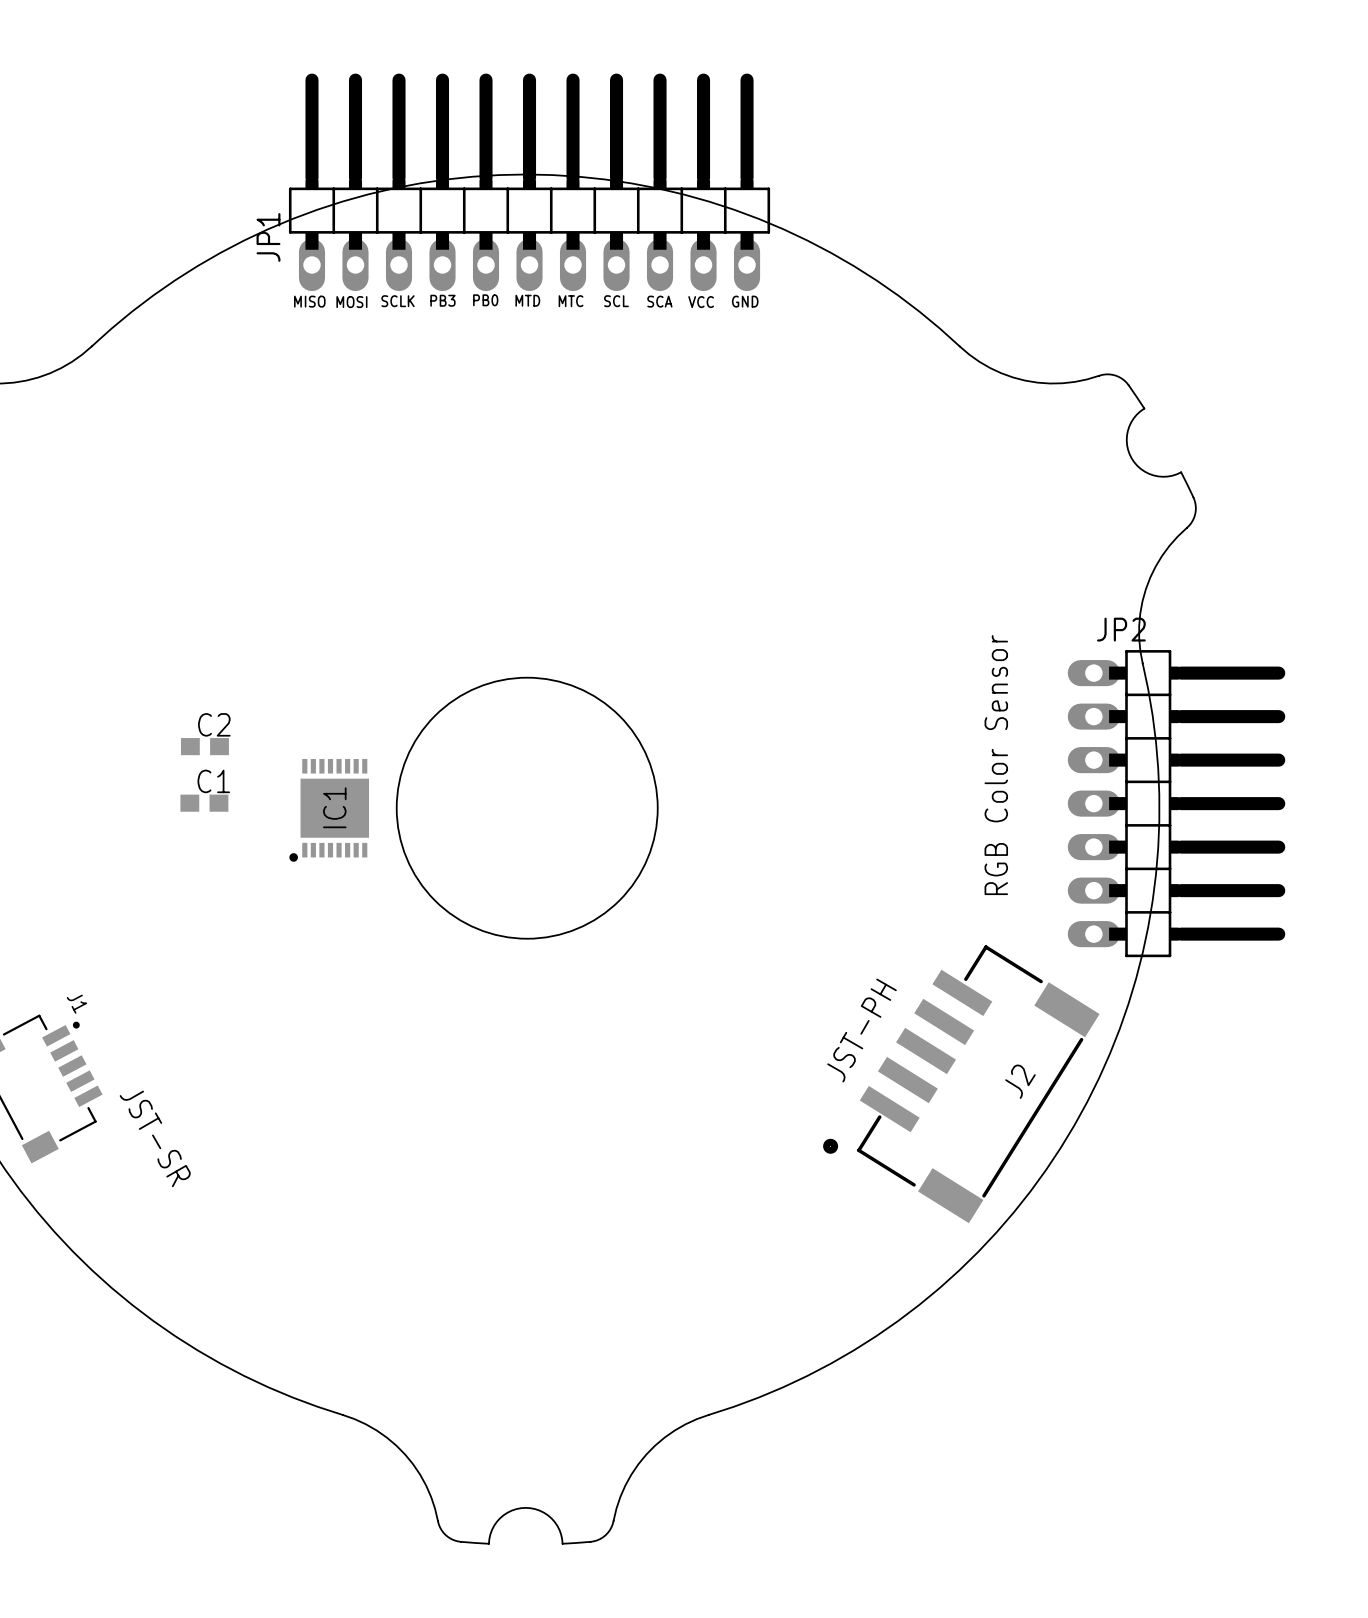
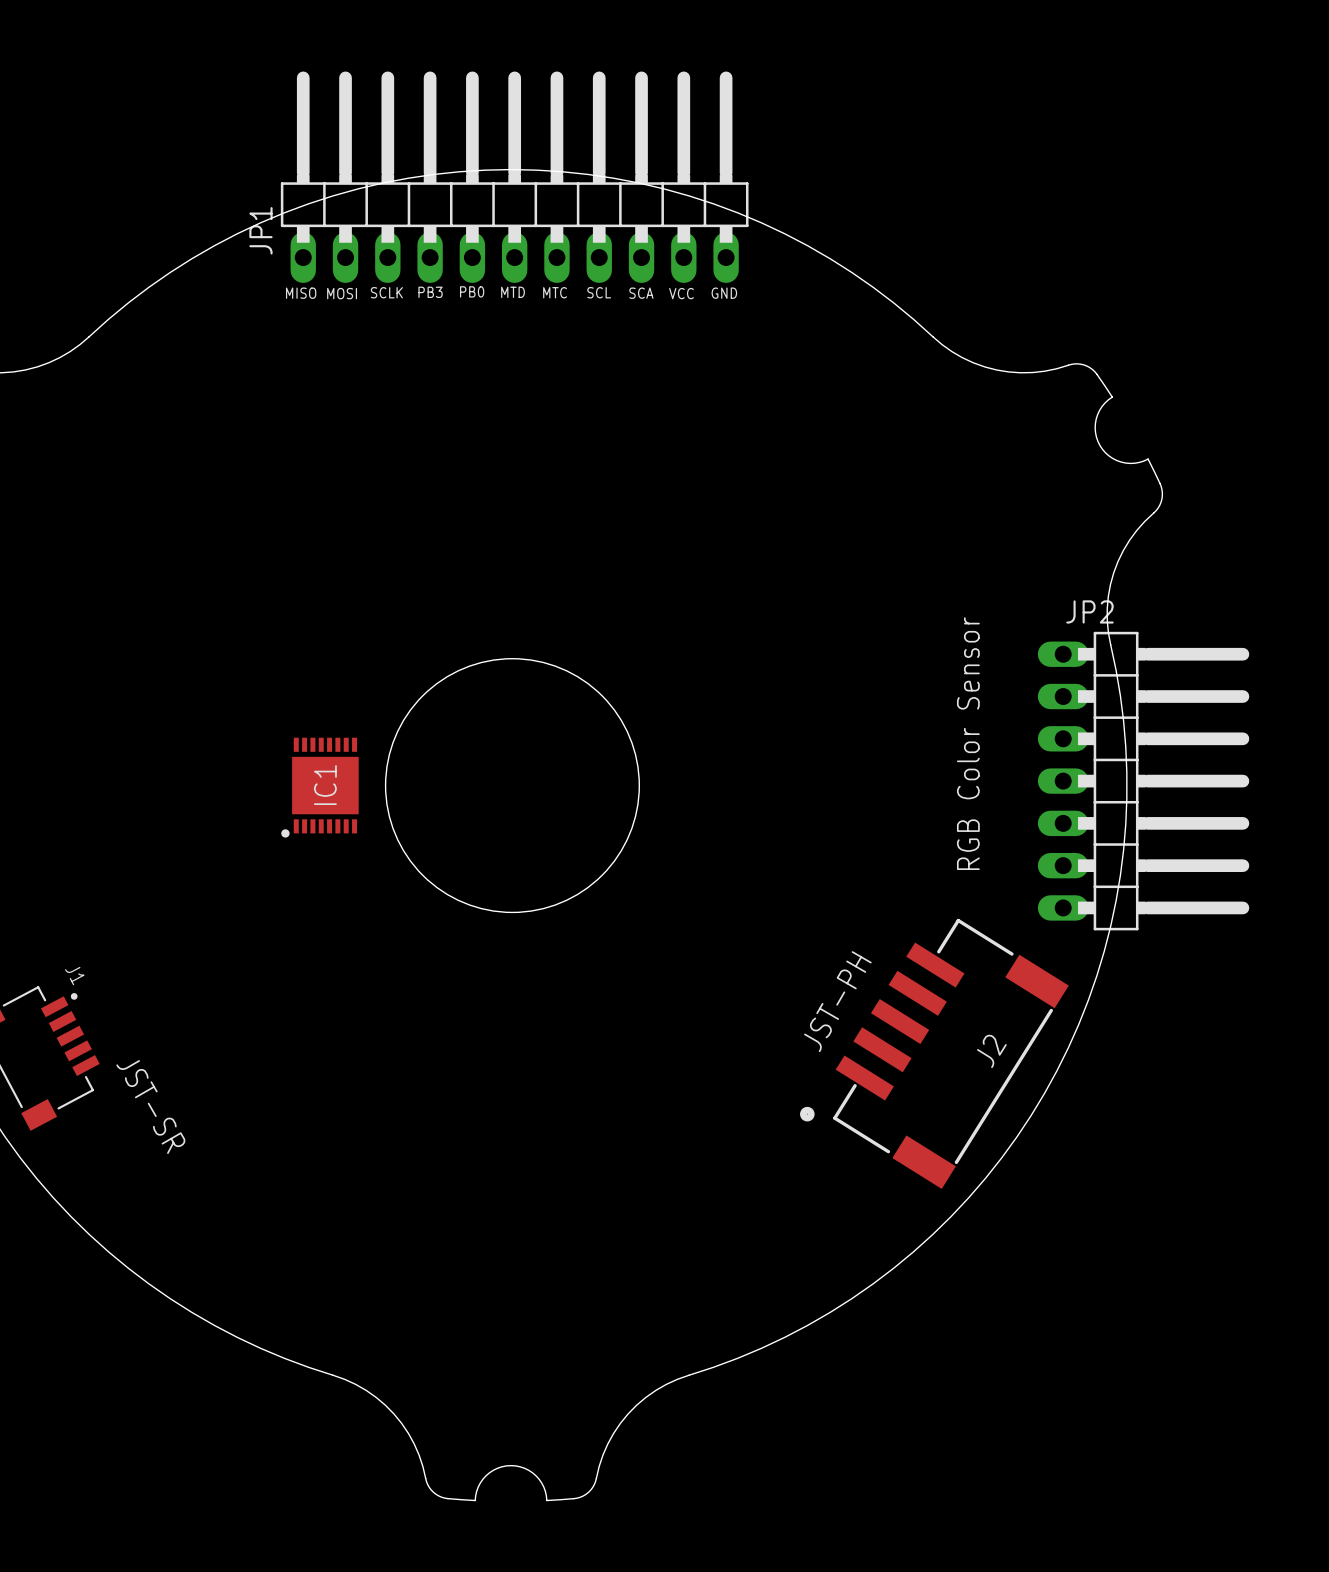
C2: (204, 746) -> none
C1: (204, 803) -> none

